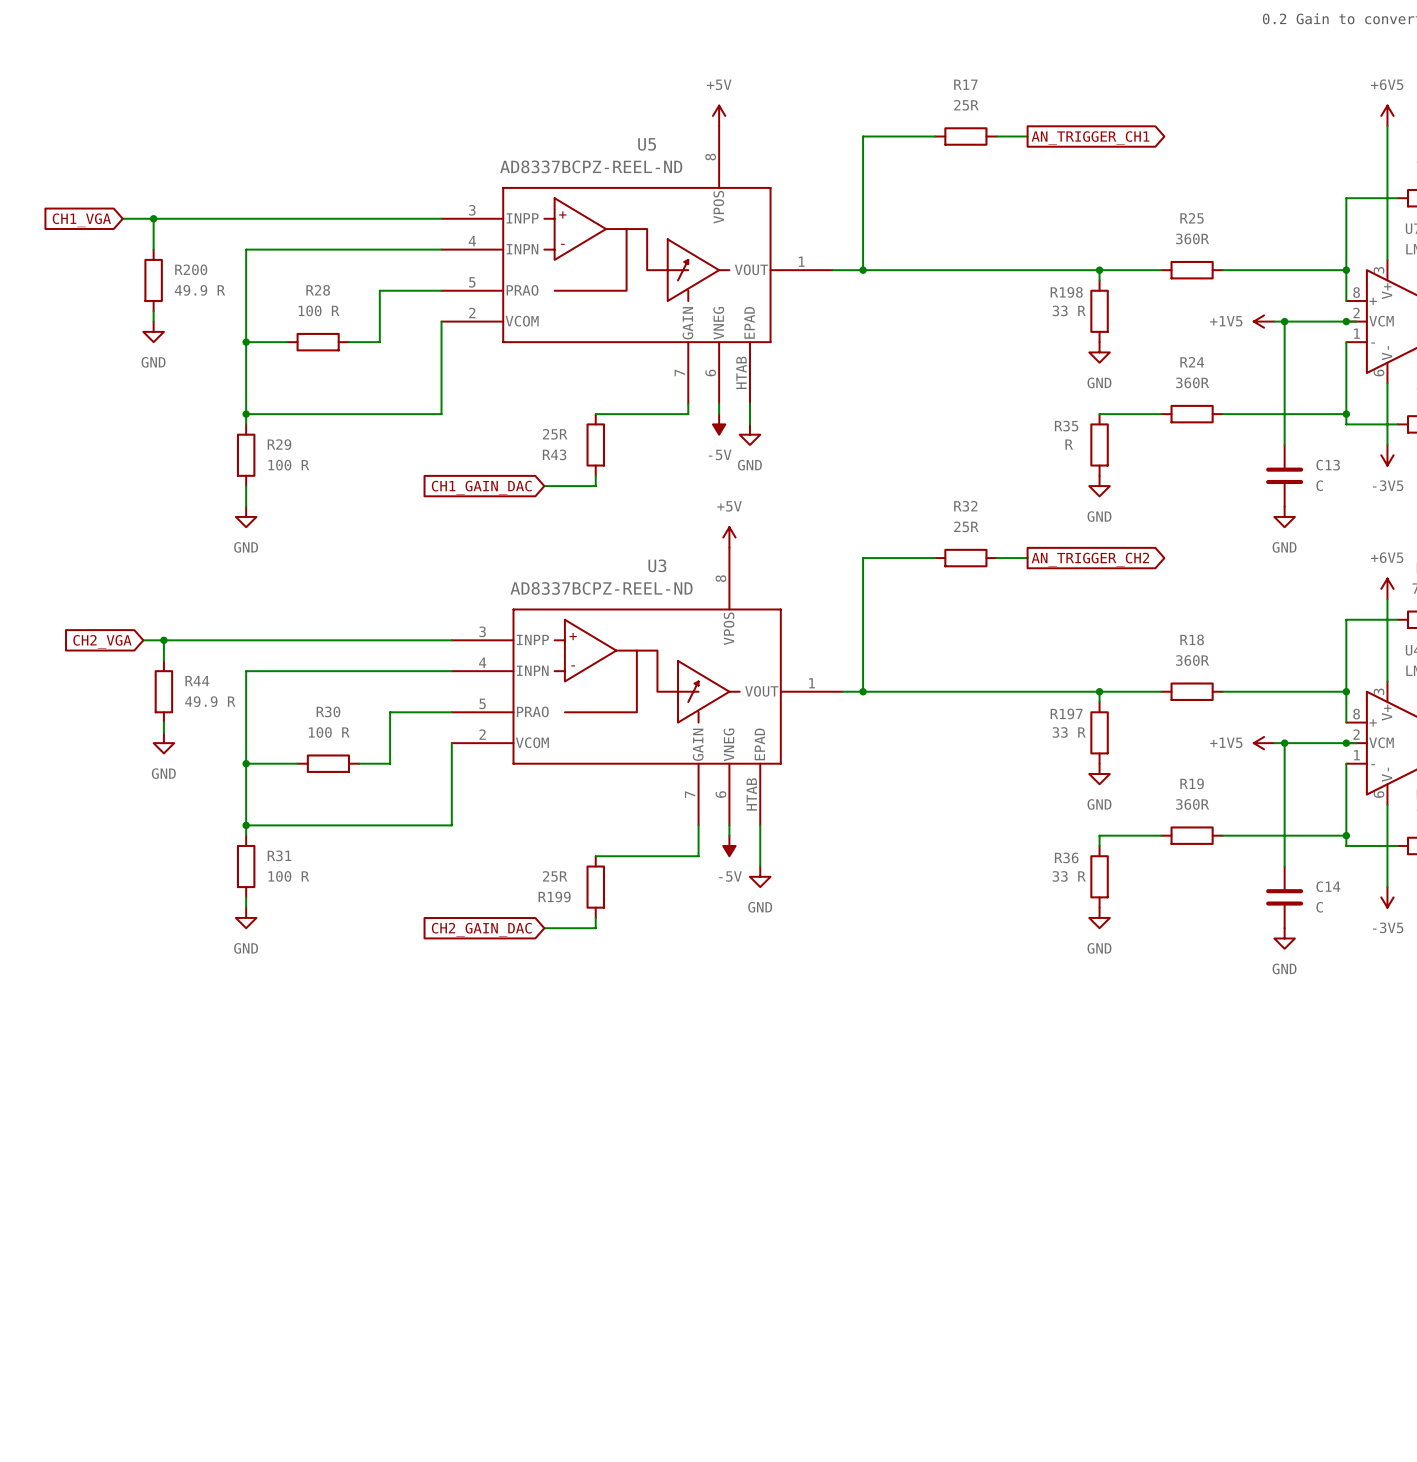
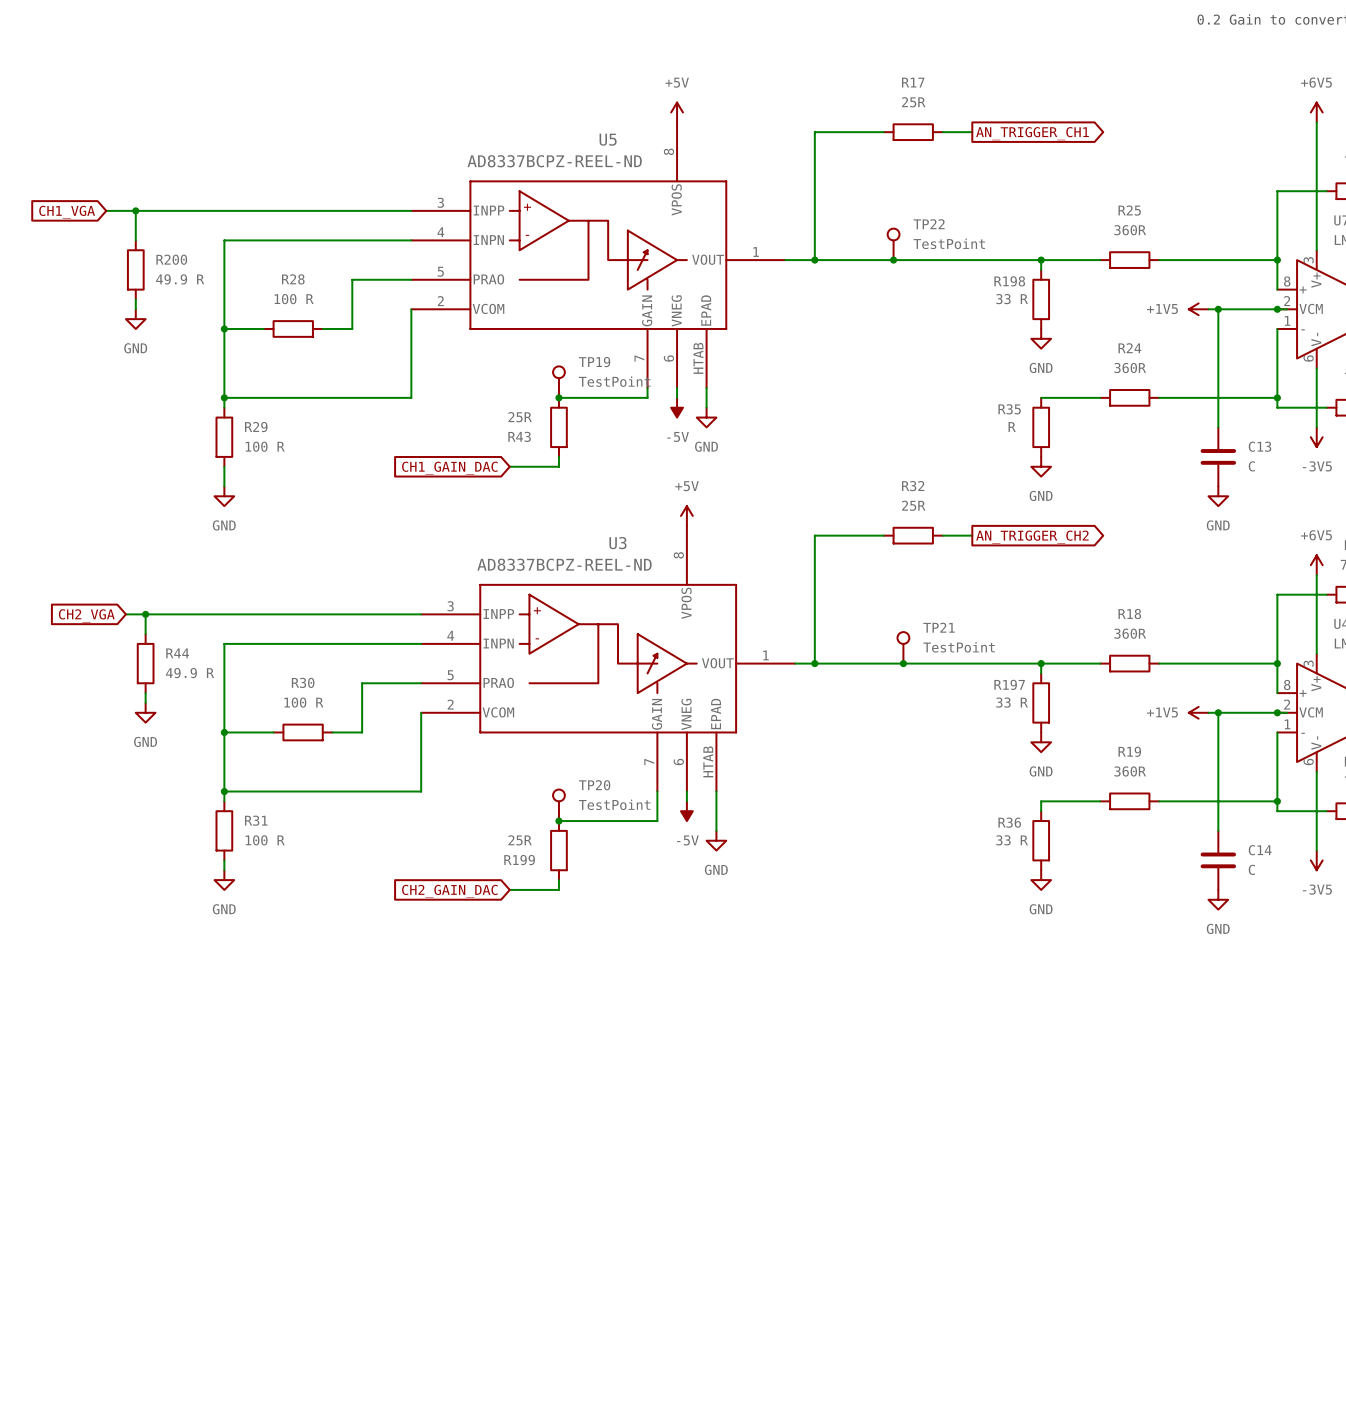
TP22: none -> TestPoint (893, 244)
junction: none -> (893, 260)
TP19: none -> TestPoint (558, 382)
junction: none -> (558, 397)
TP21: none -> TestPoint (903, 647)
junction: none -> (903, 663)
TP20: none -> TestPoint (558, 805)
junction: none -> (558, 821)

